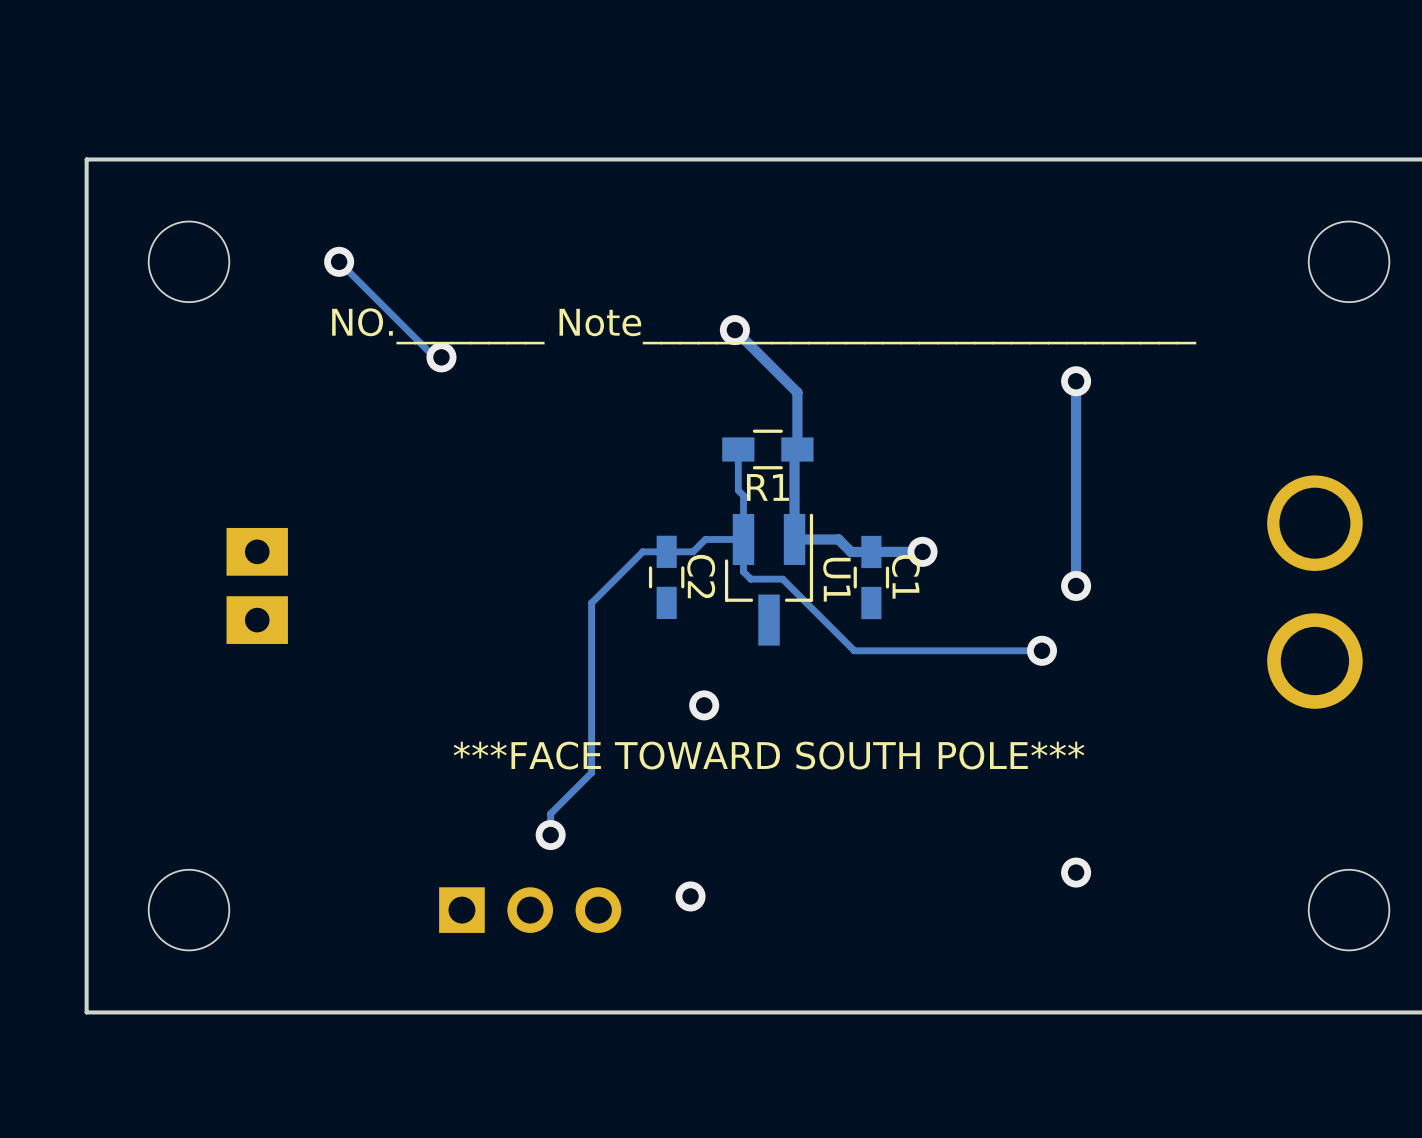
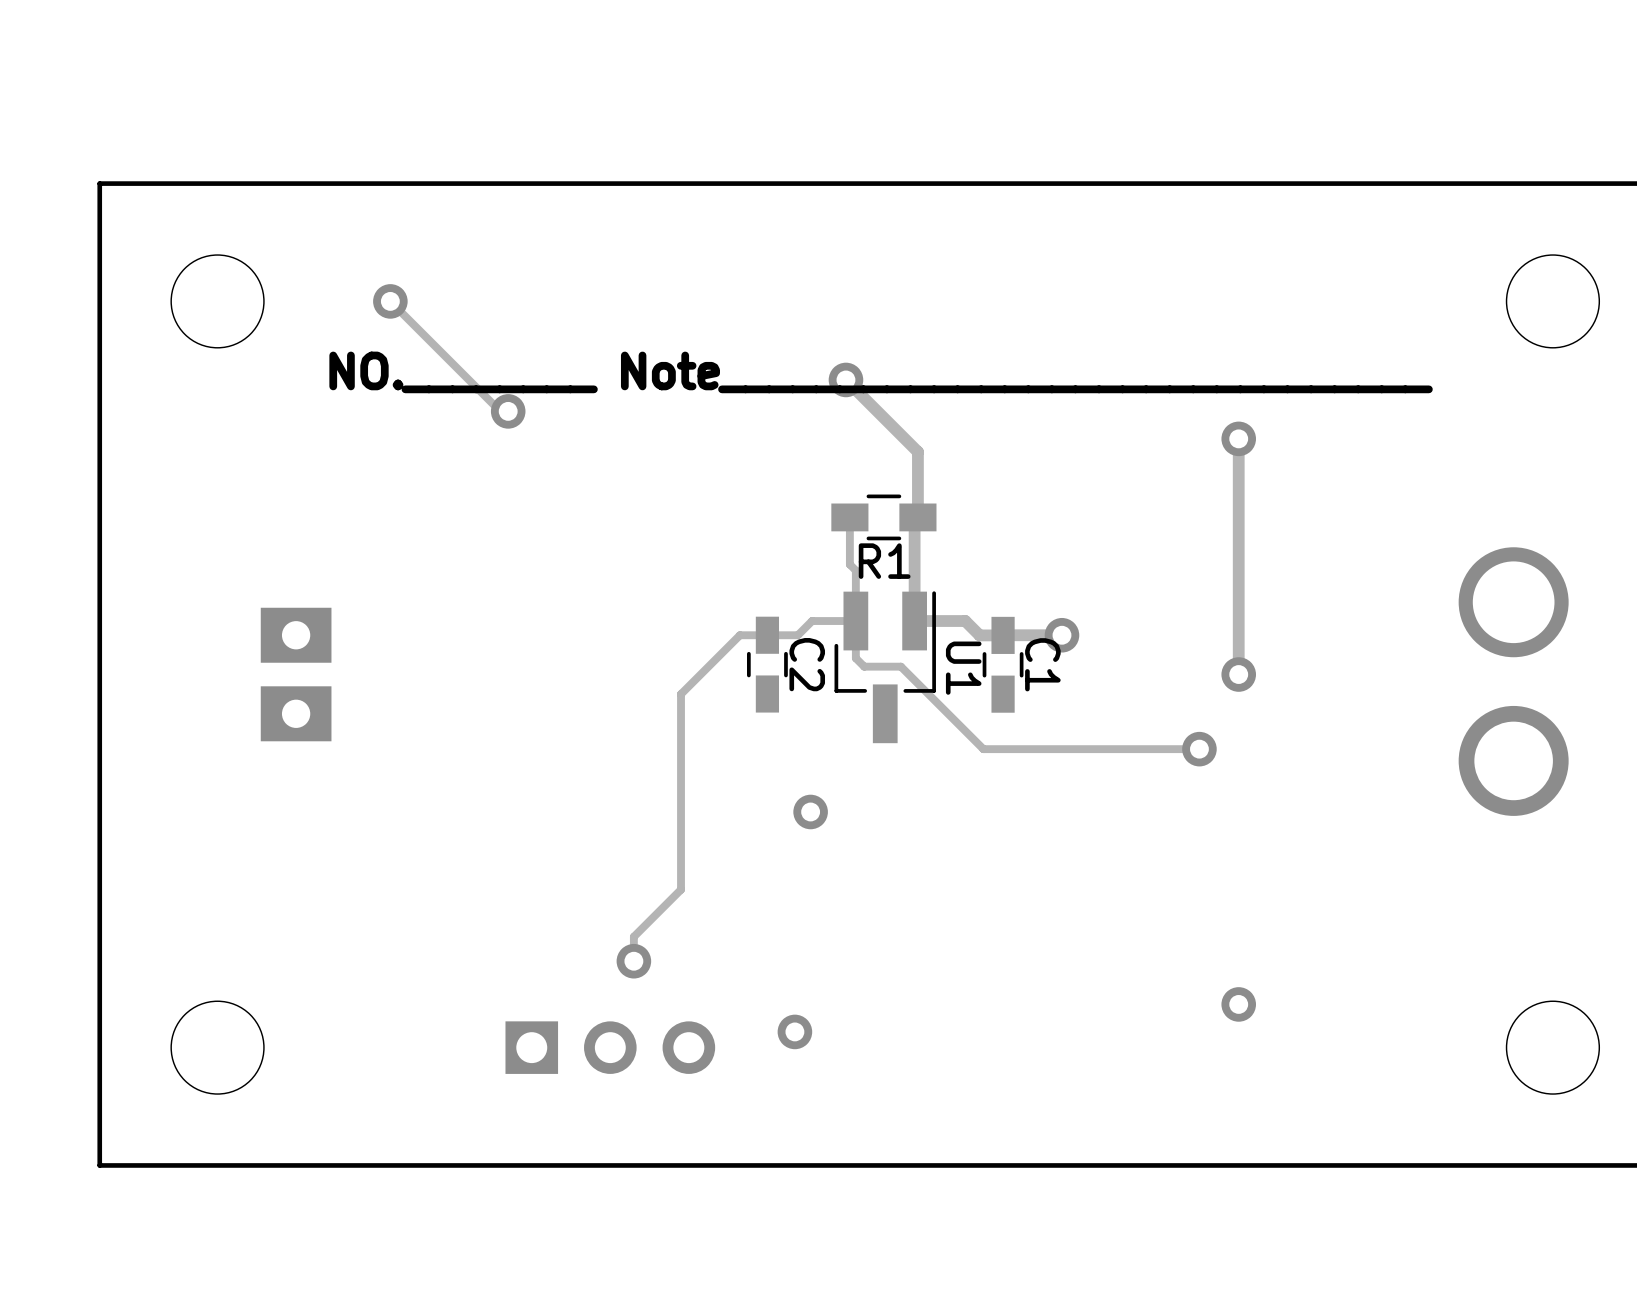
text: ***FACE TOWARD SOUTH POLE*** (769, 755) -> none

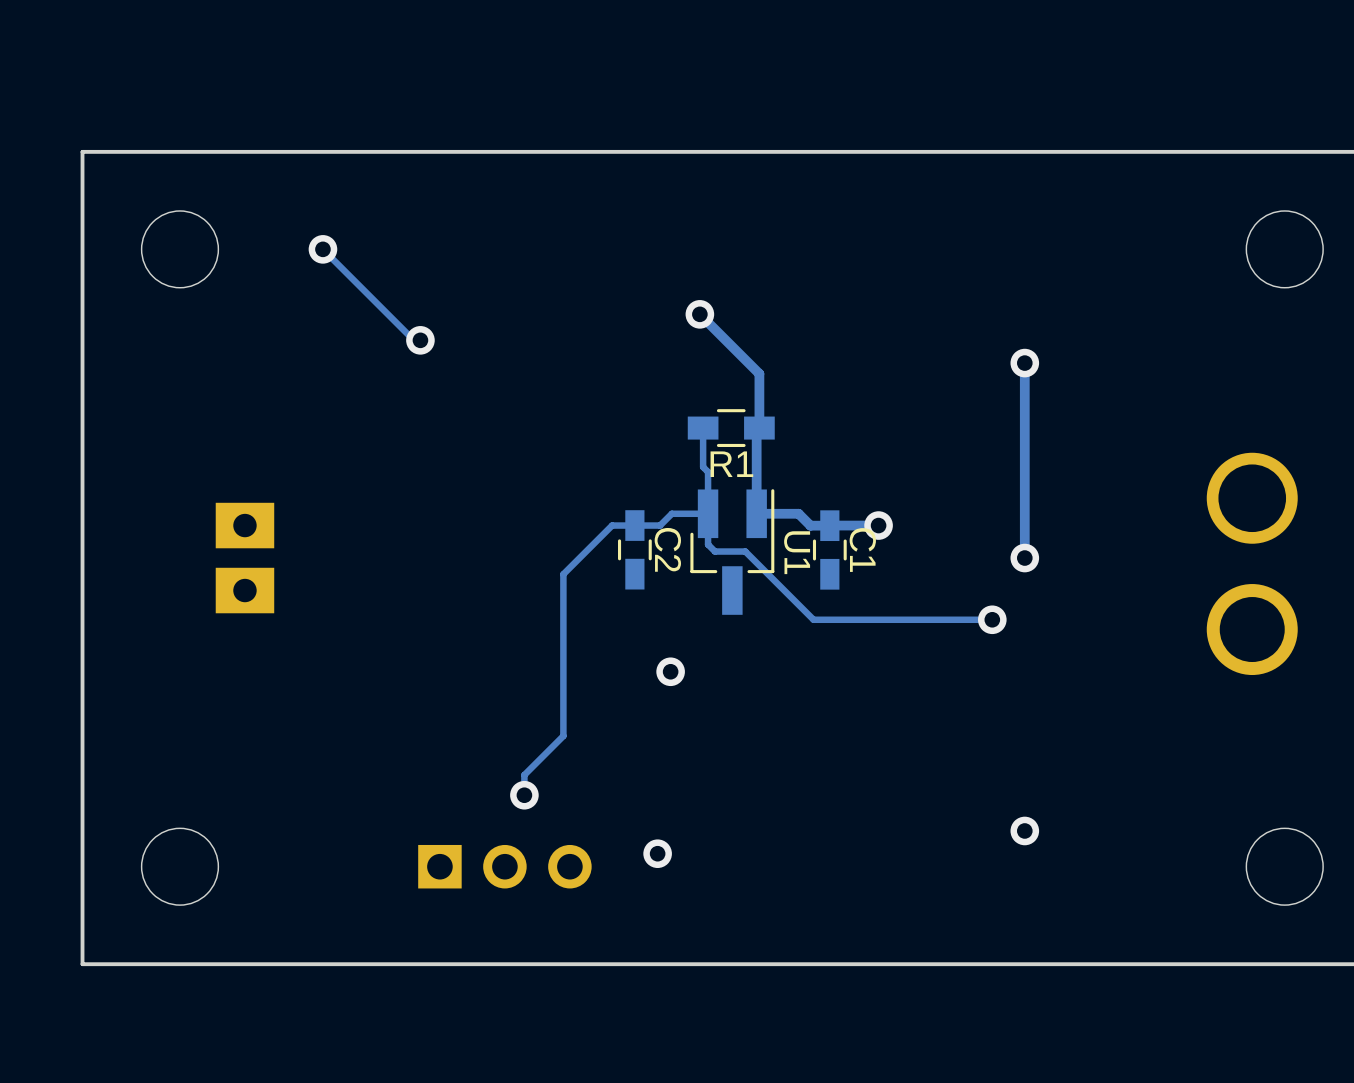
text: NO.________ Note______________________________ (881, 372) -> none

